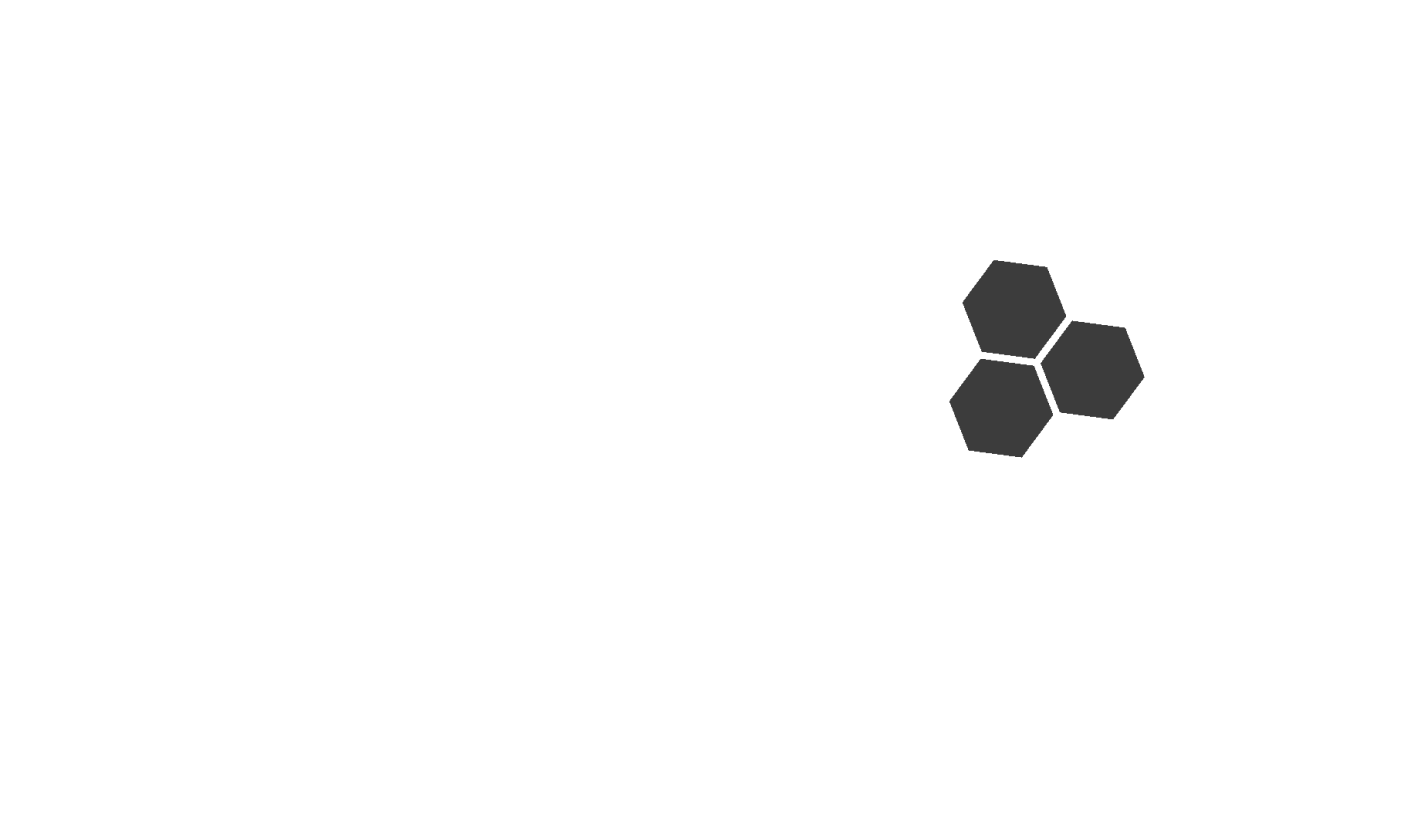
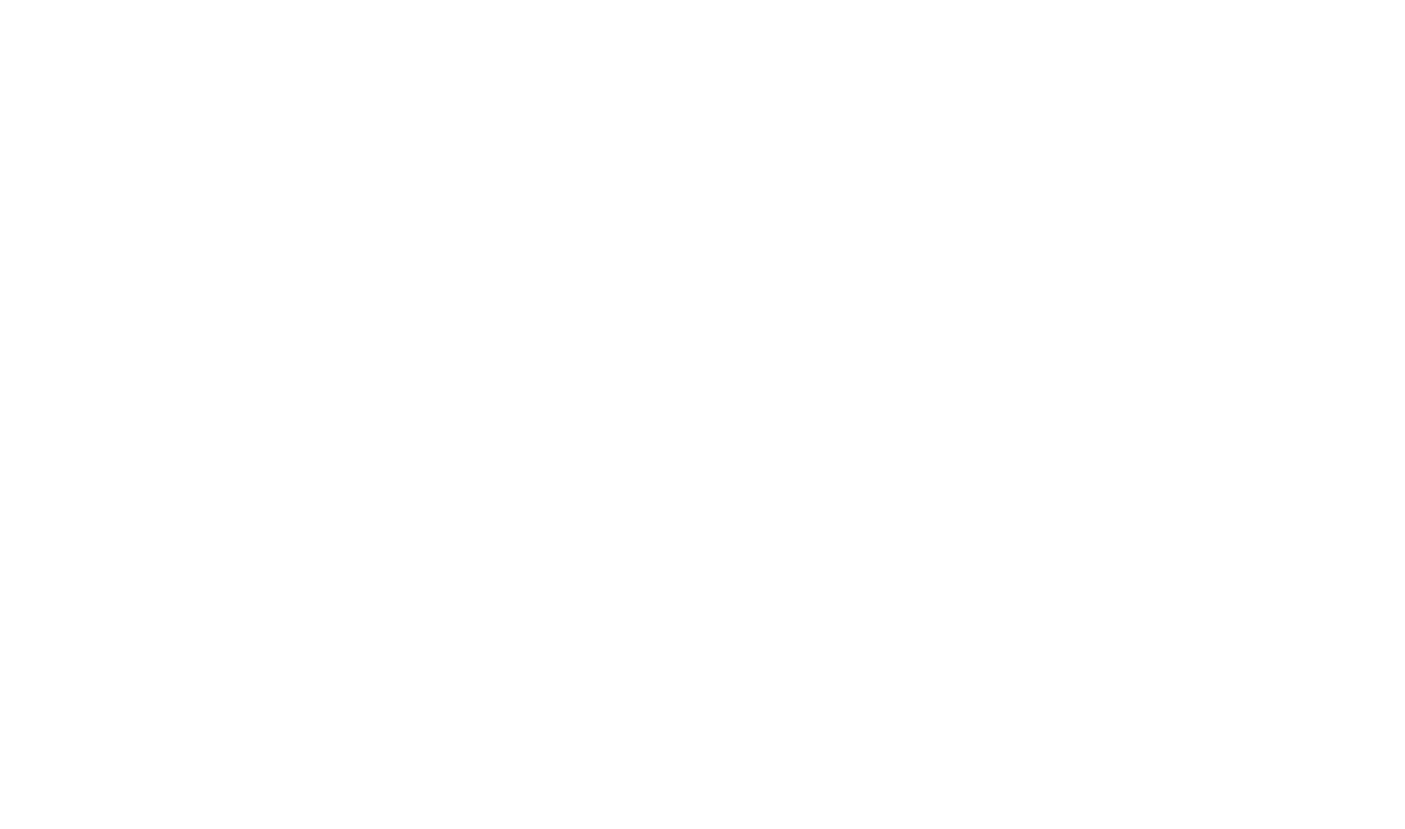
drawing: [949, 260, 1145, 458] -> none

